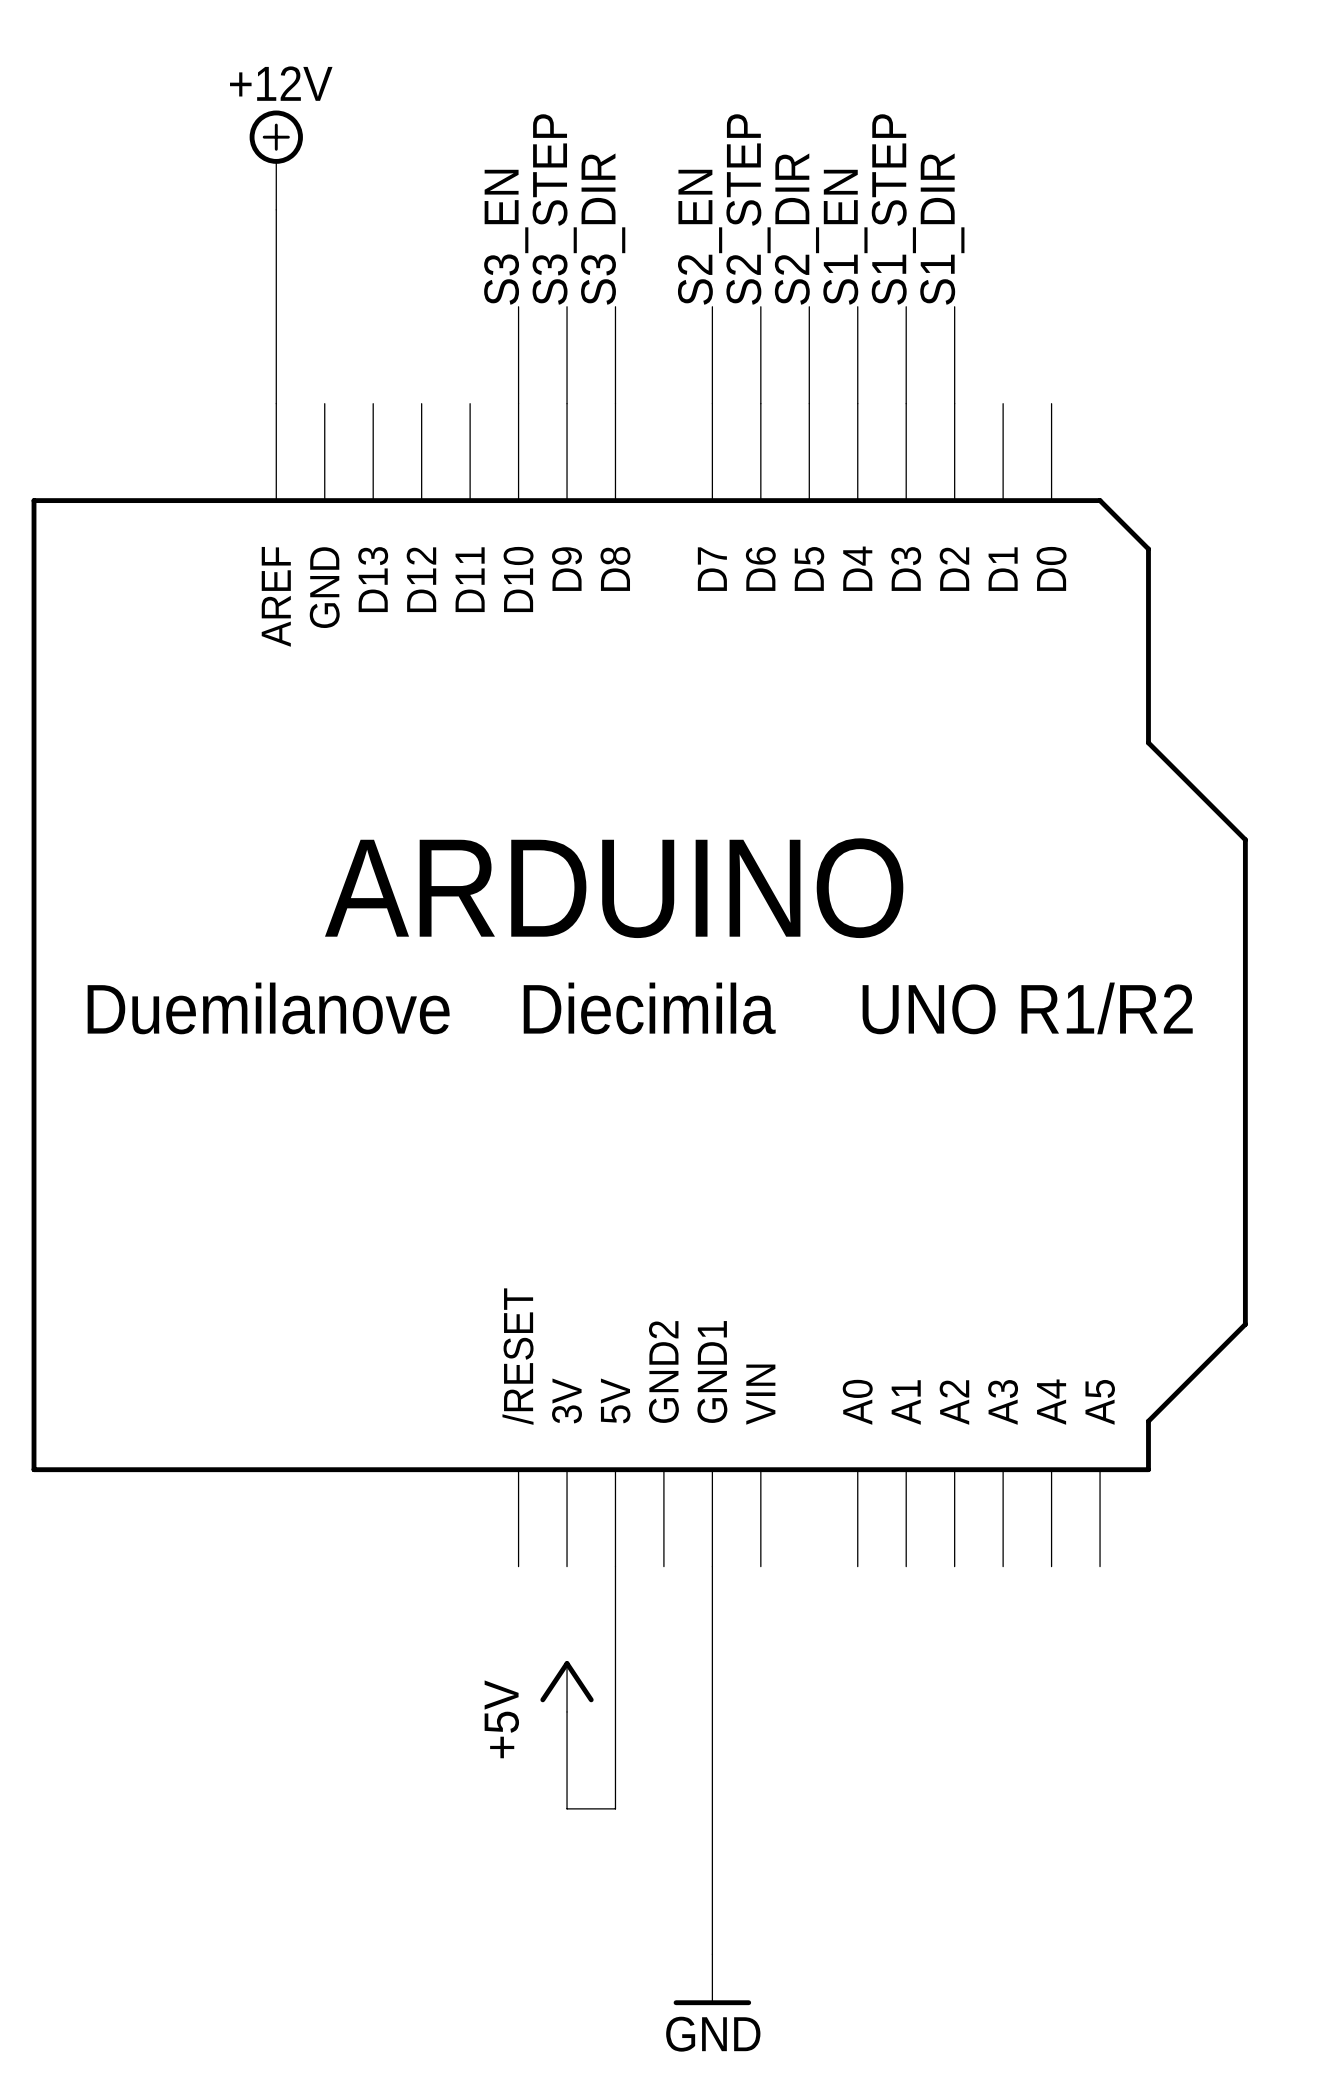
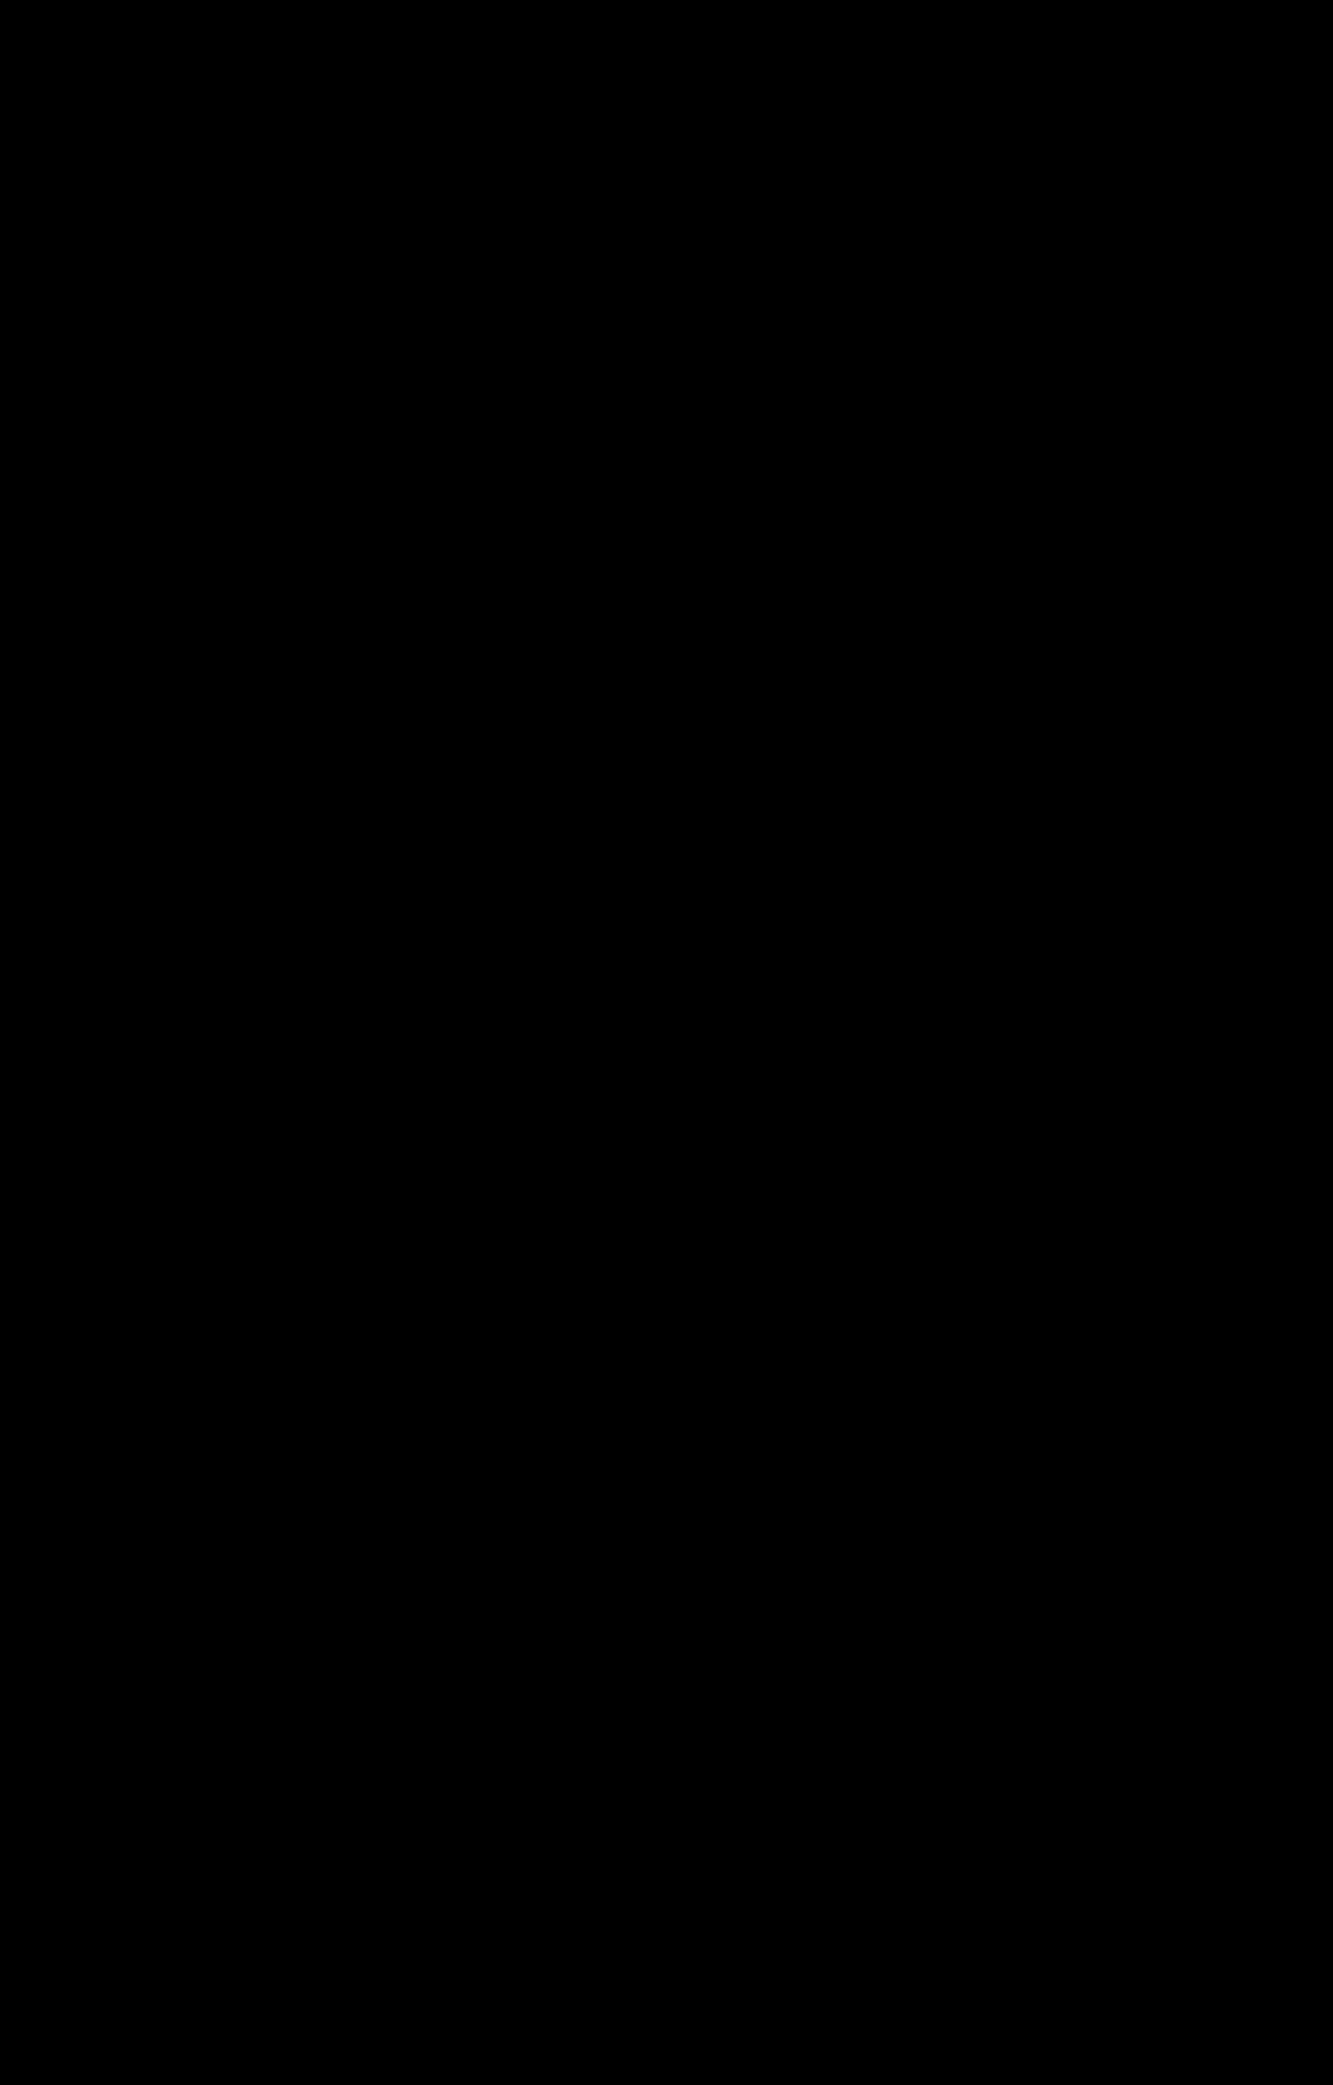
power symbol: +12V (276, 160) -> none
wire: (276, 209) (276, 403) -> none
label: S3_STEP (554, 209) -> none
label: S2_STEP (748, 209) -> none
label: S1_STEP (893, 209) -> none
label: S3_DIR (603, 229) -> none
label: S2_DIR (796, 229) -> none
label: S1_DIR (942, 229) -> none
label: S3_EN (506, 237) -> none
label: S2_EN (700, 237) -> none
label: S1_EN (845, 237) -> none
wire: (518, 306) (518, 403) -> none
wire: (567, 306) (567, 403) -> none
wire: (615, 306) (615, 403) -> none
wire: (712, 306) (712, 403) -> none
wire: (760, 306) (760, 403) -> none
wire: (809, 306) (809, 403) -> none
wire: (857, 306) (857, 403) -> none
wire: (906, 306) (906, 403) -> none
wire: (954, 306) (954, 403) -> none
part: (639, 985) -> none
wire: (615, 1566) (615, 1808) (567, 1808) (567, 1711) -> none
wire: (712, 1566) (712, 1954) -> none
power symbol: +5V (567, 1686) -> none
power symbol: GND (712, 1979) -> none

